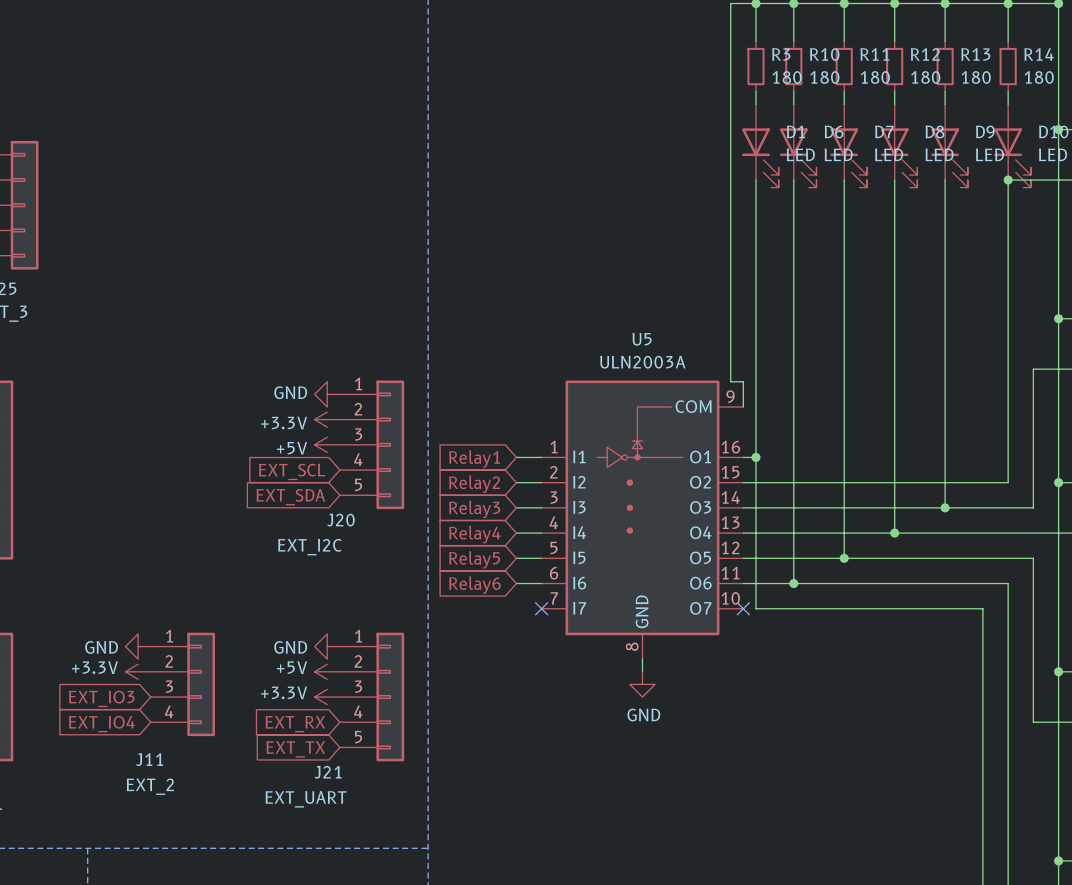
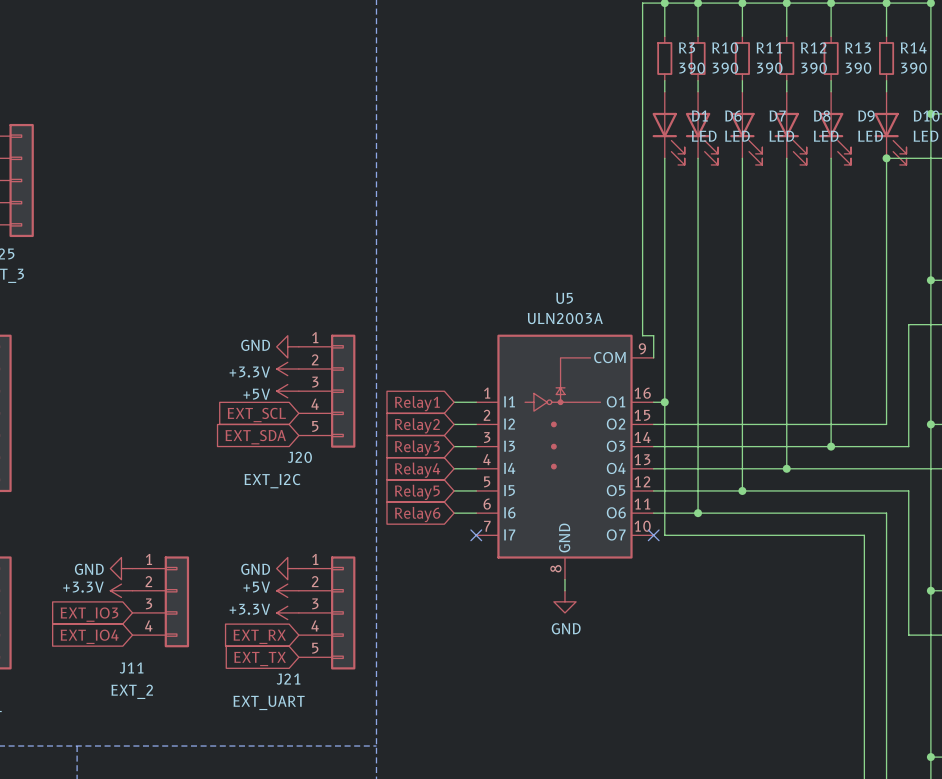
R3 value: 180 (787, 77) -> 390 (692, 68)
R10 value: 180 (824, 77) -> 390 (725, 68)
R11 value: 180 (875, 77) -> 390 (769, 68)
R12 value: 180 (925, 77) -> 390 (814, 68)
R13 value: 180 (976, 77) -> 390 (858, 68)
R14 value: 180 (1039, 77) -> 390 (913, 68)

